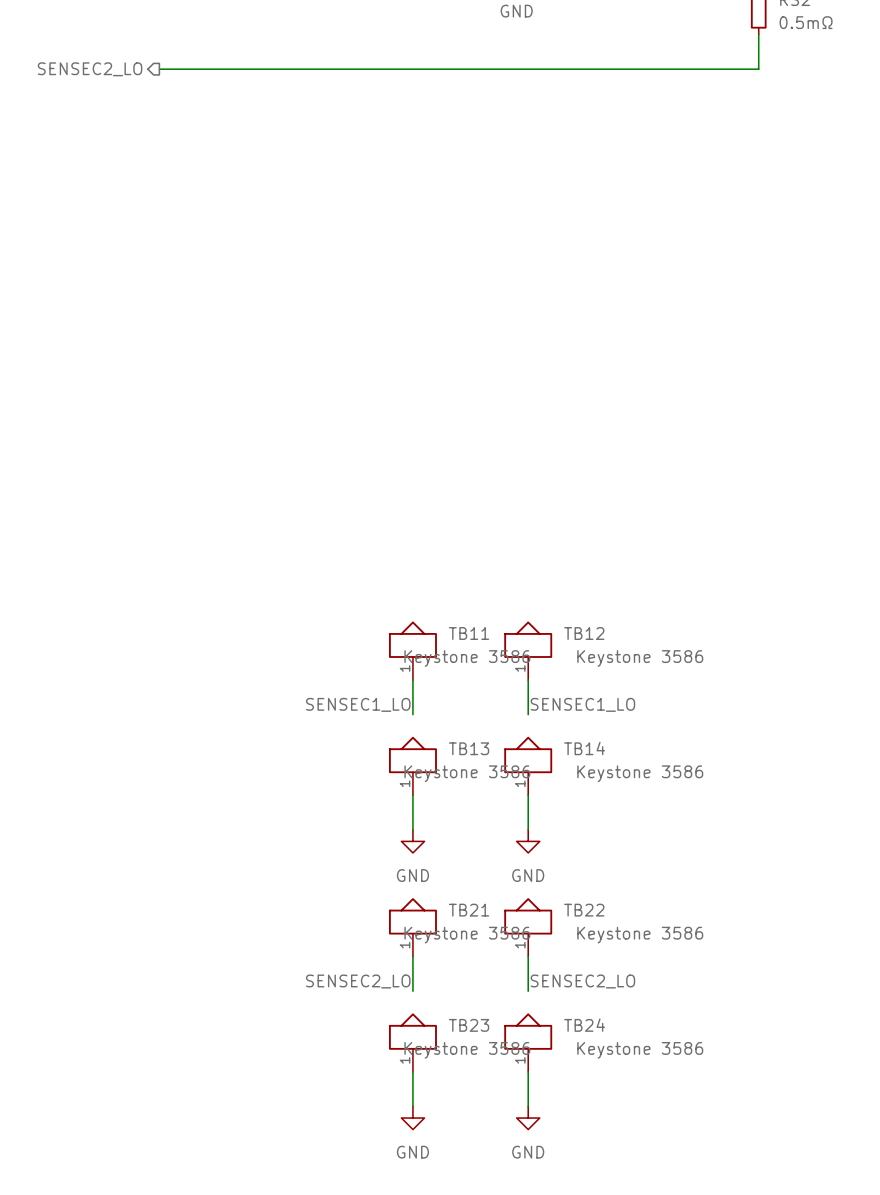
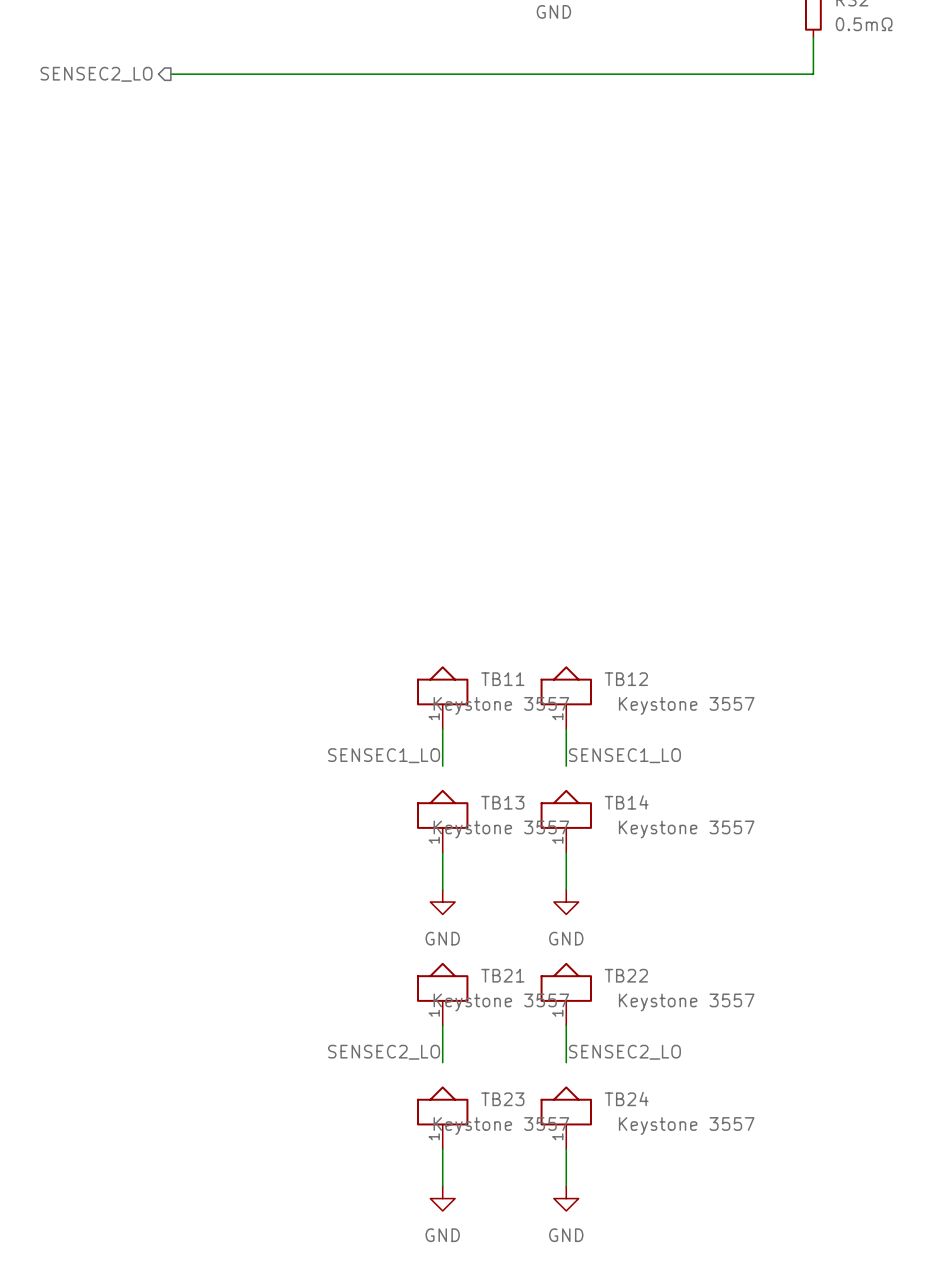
TB11 value: Keystone 3586 (467, 658) -> Keystone 3557 (501, 705)
TB12 value: Keystone 3586 (640, 658) -> Keystone 3557 (686, 705)
TB13 value: Keystone 3586 (467, 773) -> Keystone 3557 (501, 829)
TB14 value: Keystone 3586 (640, 773) -> Keystone 3557 (686, 829)
TB21 value: Keystone 3586 (467, 935) -> Keystone 3557 (501, 1002)
TB22 value: Keystone 3586 (640, 935) -> Keystone 3557 (686, 1002)
TB23 value: Keystone 3586 (467, 1050) -> Keystone 3557 (501, 1126)
TB24 value: Keystone 3586 (640, 1050) -> Keystone 3557 (686, 1126)

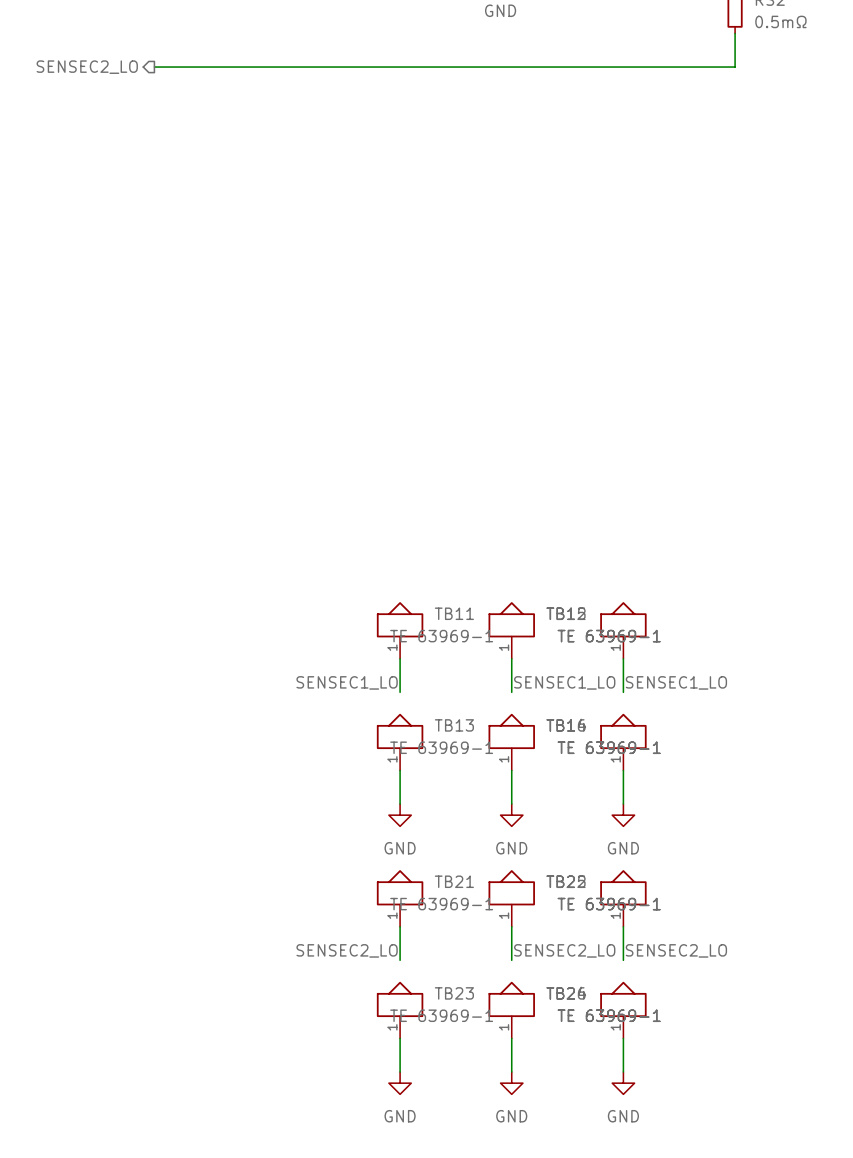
part: none -> TE 63969-1 (623, 630)
TB11 value: Keystone 3557 (501, 705) -> TE 63969-1 (441, 636)
TB12 value: Keystone 3557 (686, 705) -> TE 63969-1 (609, 636)
wire: none -> (623, 658) (623, 692)
label: none -> SENSEC1_LO (676, 682)
part: none -> TE 63969-1 (623, 742)
TB13 value: Keystone 3557 (501, 829) -> TE 63969-1 (441, 747)
TB14 value: Keystone 3557 (686, 829) -> TE 63969-1 (609, 747)
wire: none -> (623, 770) (623, 804)
power symbol: none -> GND (623, 815)
part: none -> TE 63969-1 (623, 898)
TB21 value: Keystone 3557 (501, 1002) -> TE 63969-1 (441, 904)
TB22 value: Keystone 3557 (686, 1002) -> TE 63969-1 (609, 904)
wire: none -> (623, 926) (623, 960)
label: none -> SENSEC2_LO (676, 950)
part: none -> TE 63969-1 (623, 1010)
TB23 value: Keystone 3557 (501, 1126) -> TE 63969-1 (441, 1015)
TB24 value: Keystone 3557 (686, 1126) -> TE 63969-1 (609, 1015)
wire: none -> (623, 1038) (623, 1071)
power symbol: none -> GND (623, 1083)

